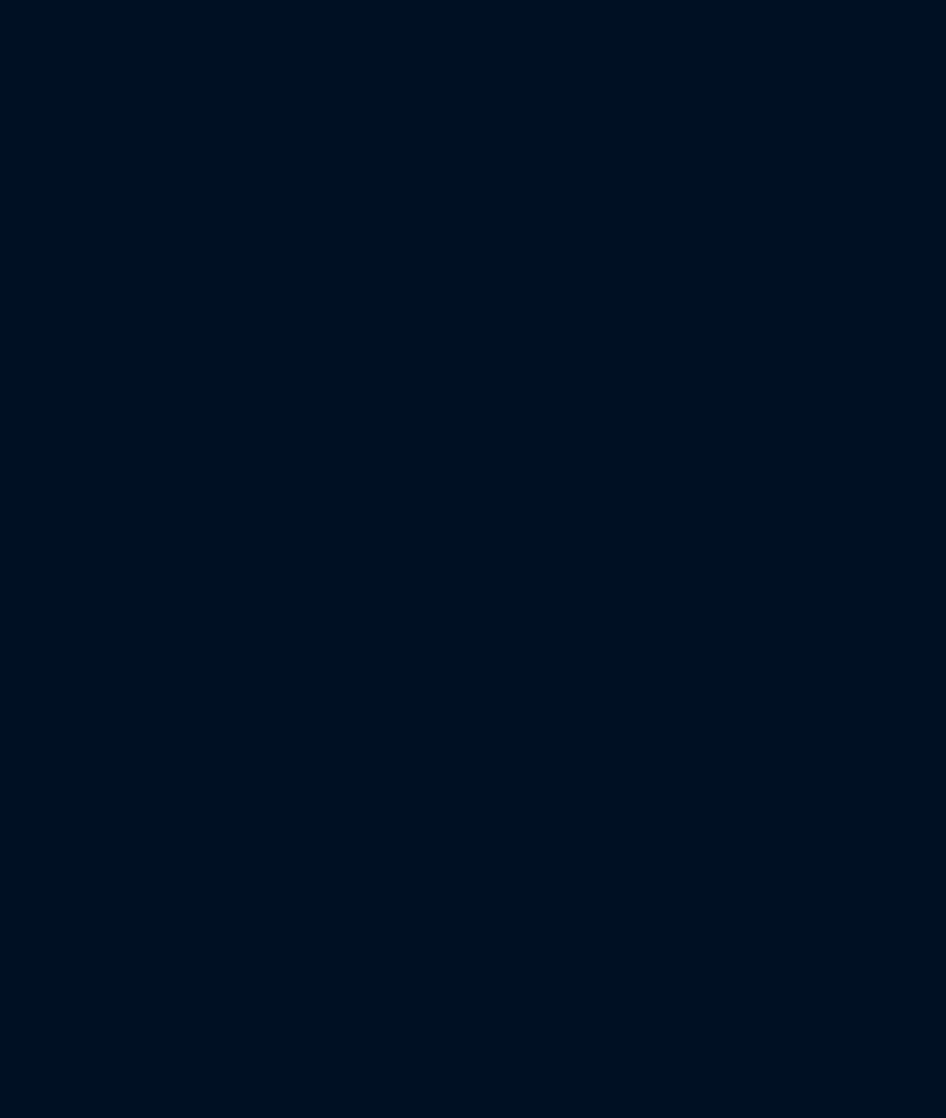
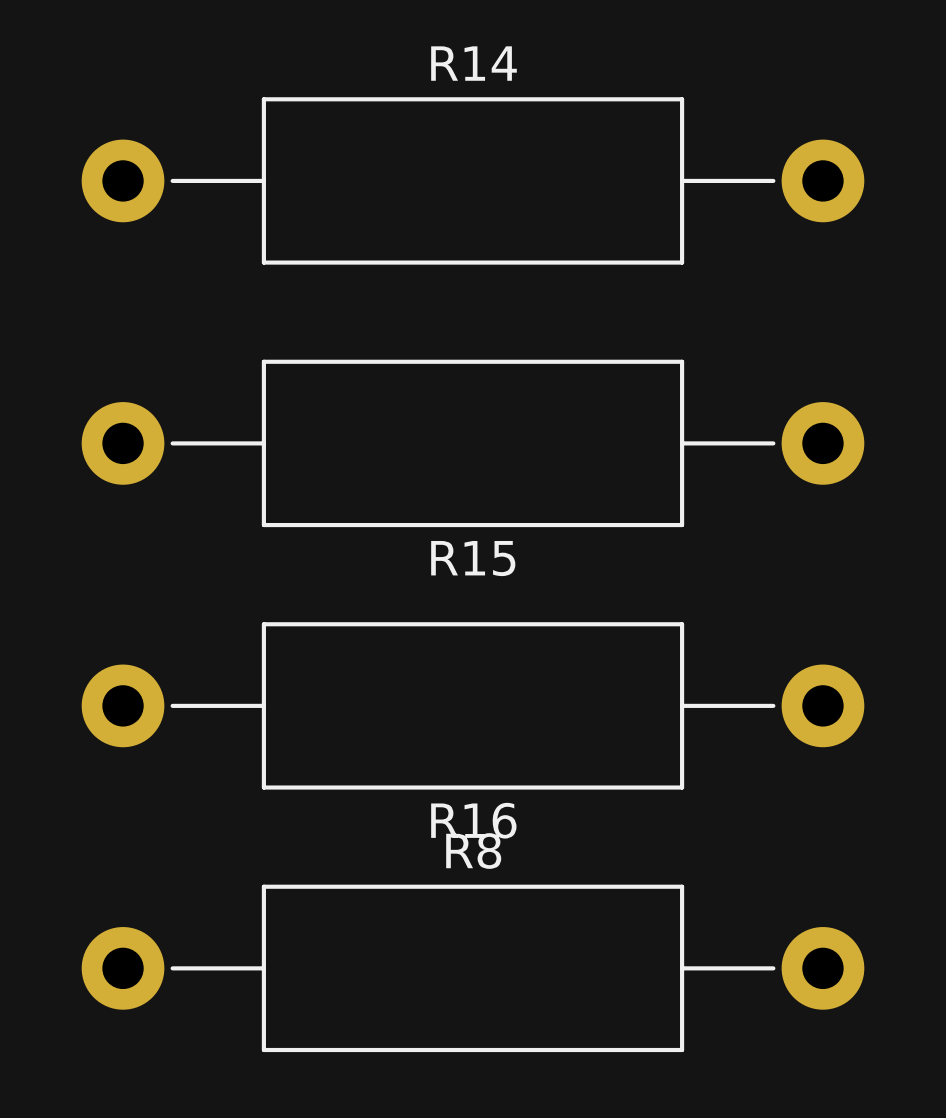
R14: none -> (472, 180)
R15: none -> (472, 443)
R16: none -> (472, 705)
R8: none -> (472, 968)

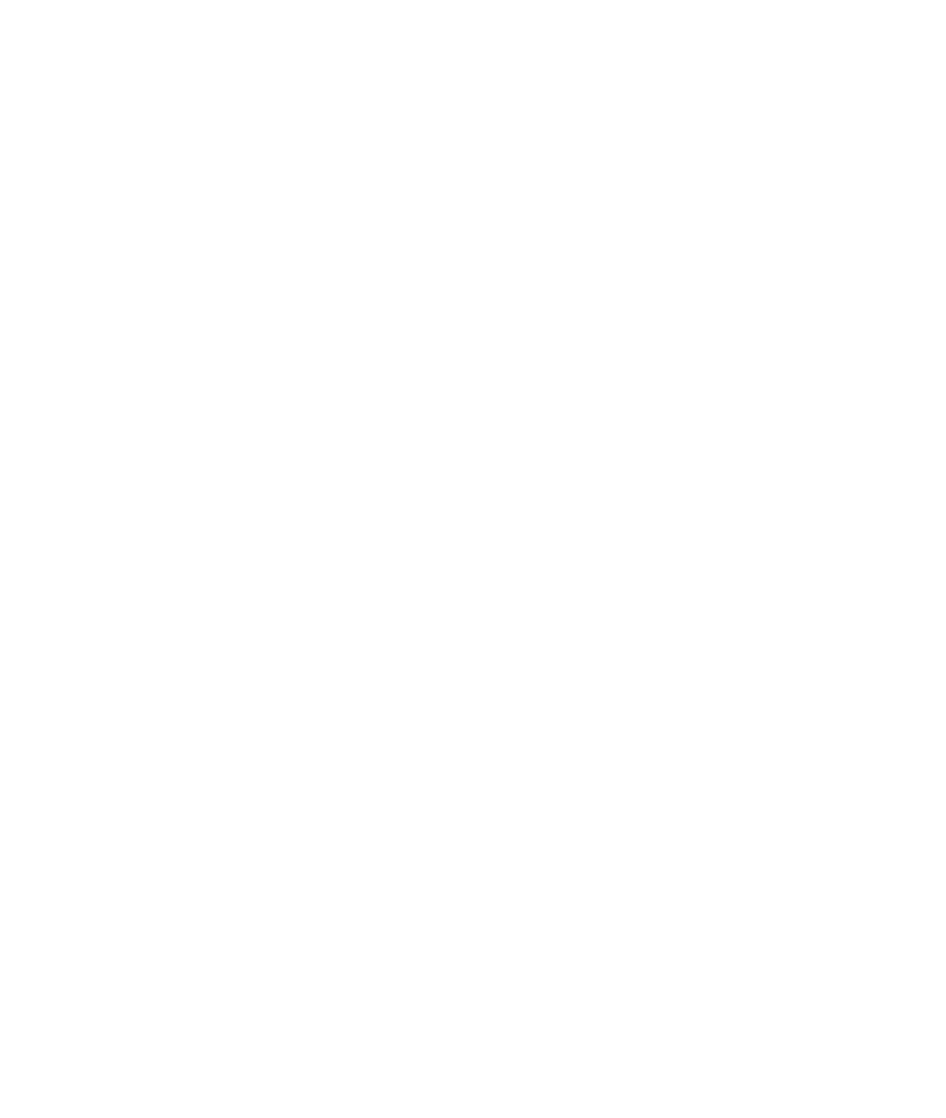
R14: (472, 180) -> none
R15: (472, 443) -> none
R16: (472, 705) -> none
R8: (472, 968) -> none

